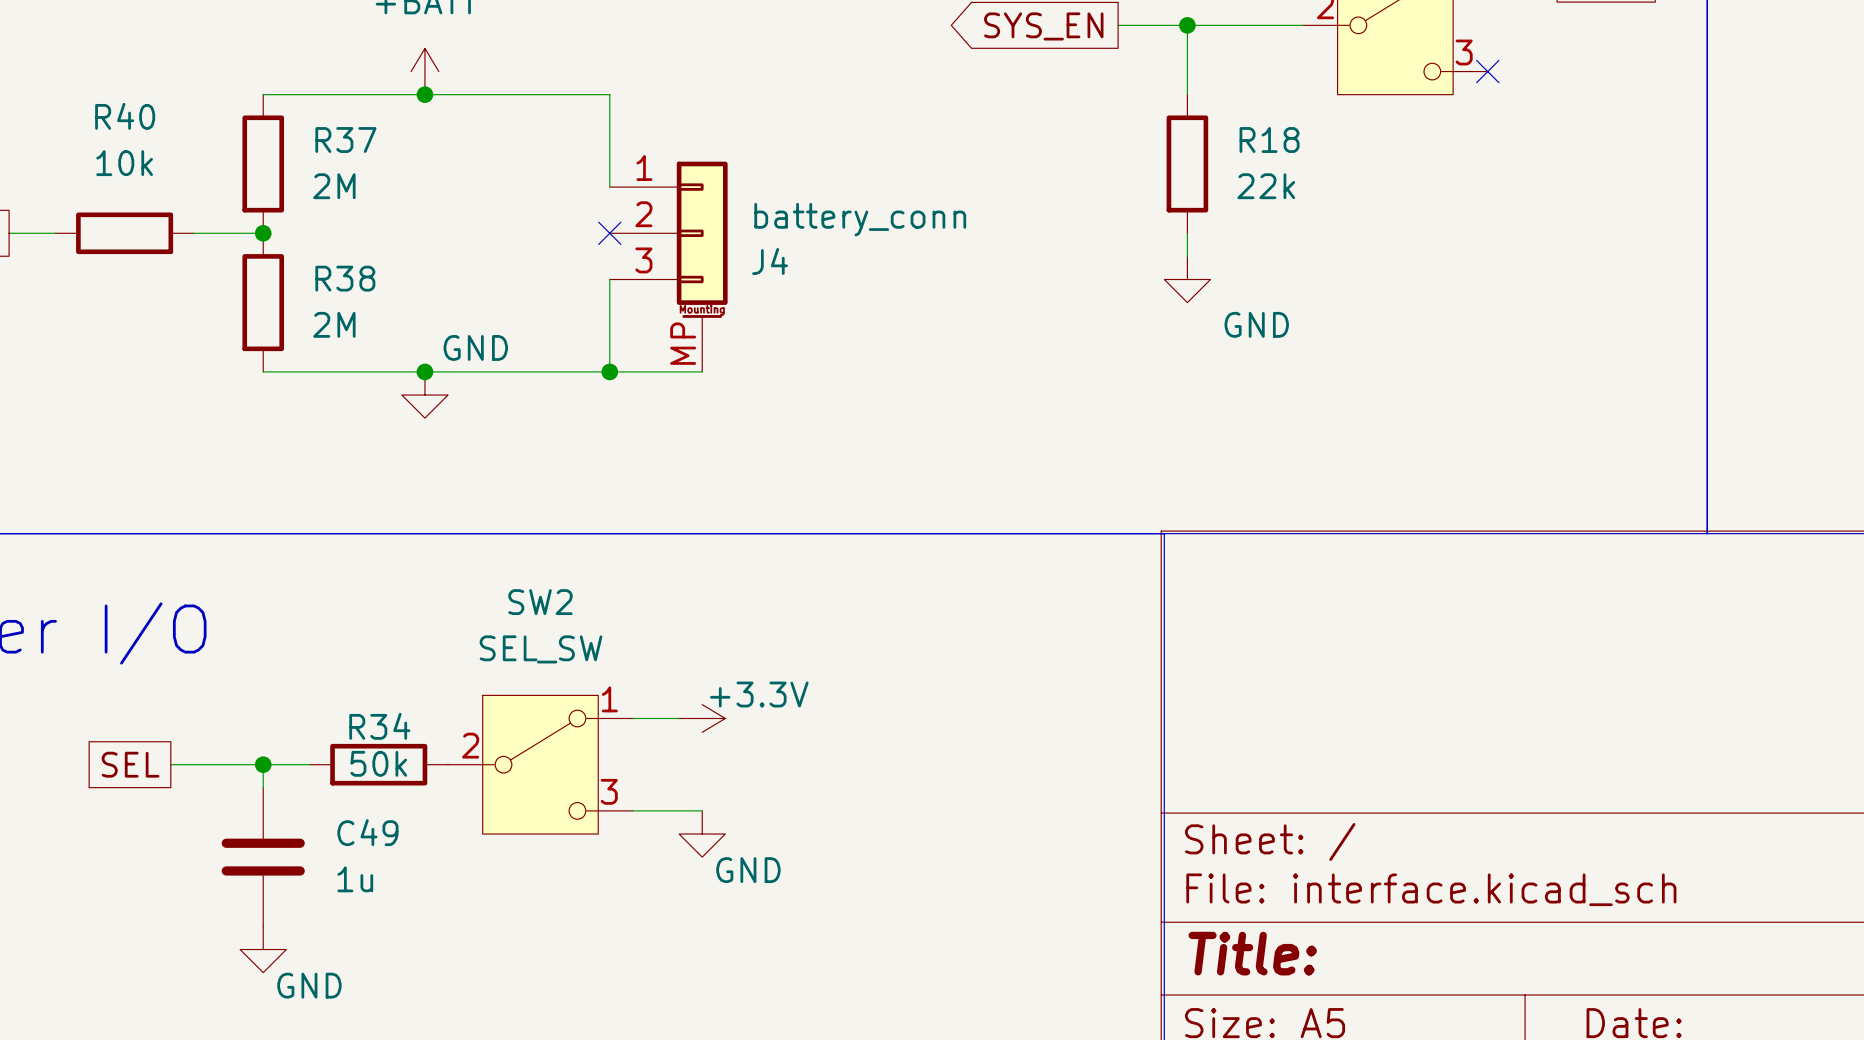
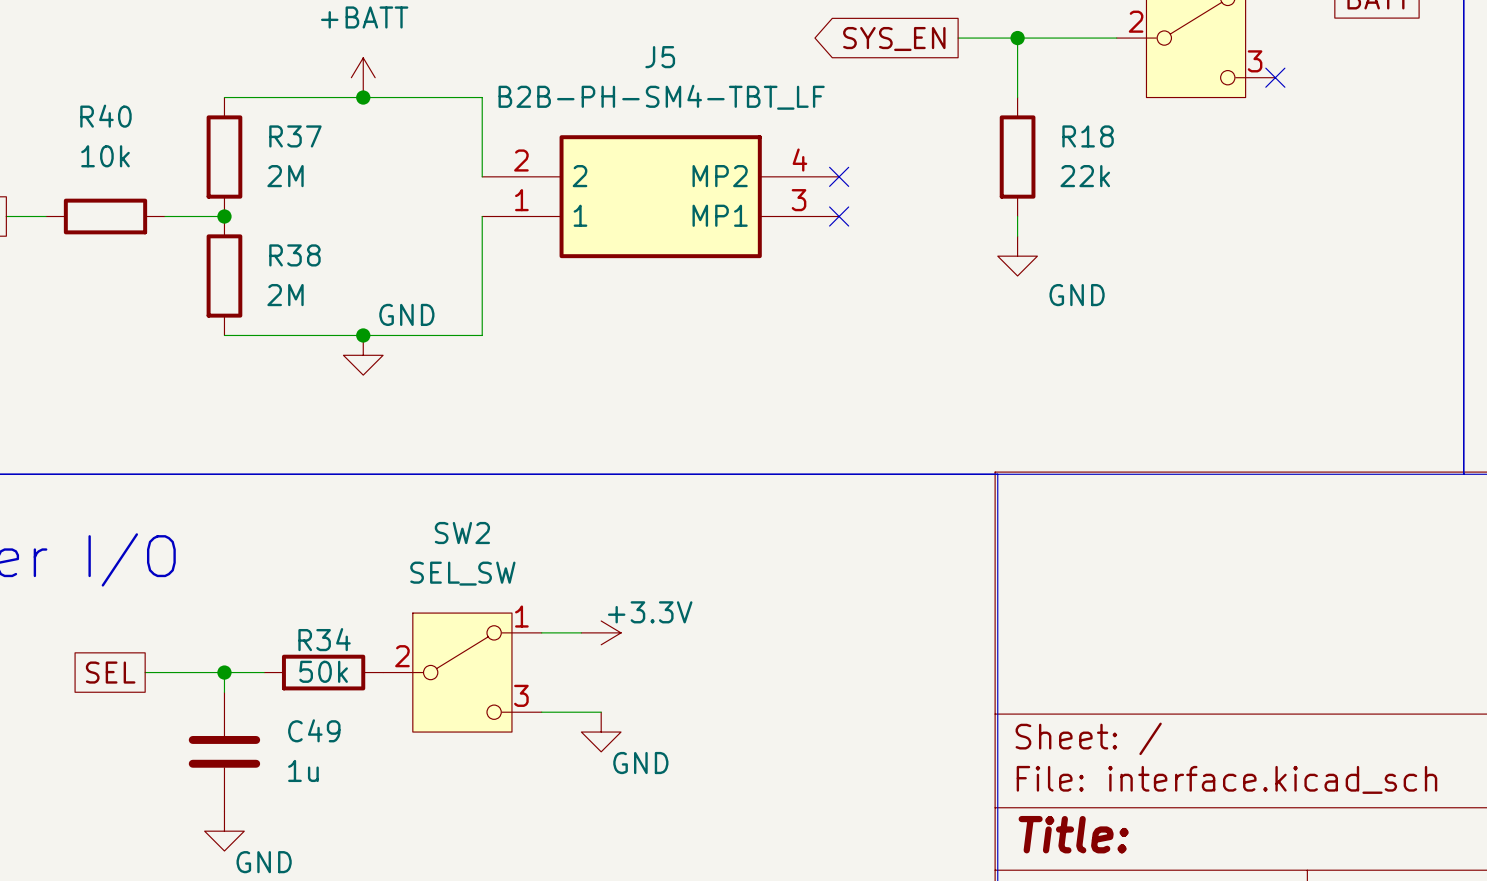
wire: (563, 94) (609, 94) (609, 187) -> (482, 97) (482, 176)
no-connect mark: none -> (839, 176)
J5: none -> B2B-PH-SM4-TBT_LF (660, 196)
no-connect mark: (609, 233) -> none
no-connect mark: none -> (839, 216)
J4: battery_conn (668, 266) -> none
wire: (609, 279) (609, 371) -> none
wire: (563, 371) (702, 371) -> (482, 335) (482, 216)
junction: (609, 371) -> none

